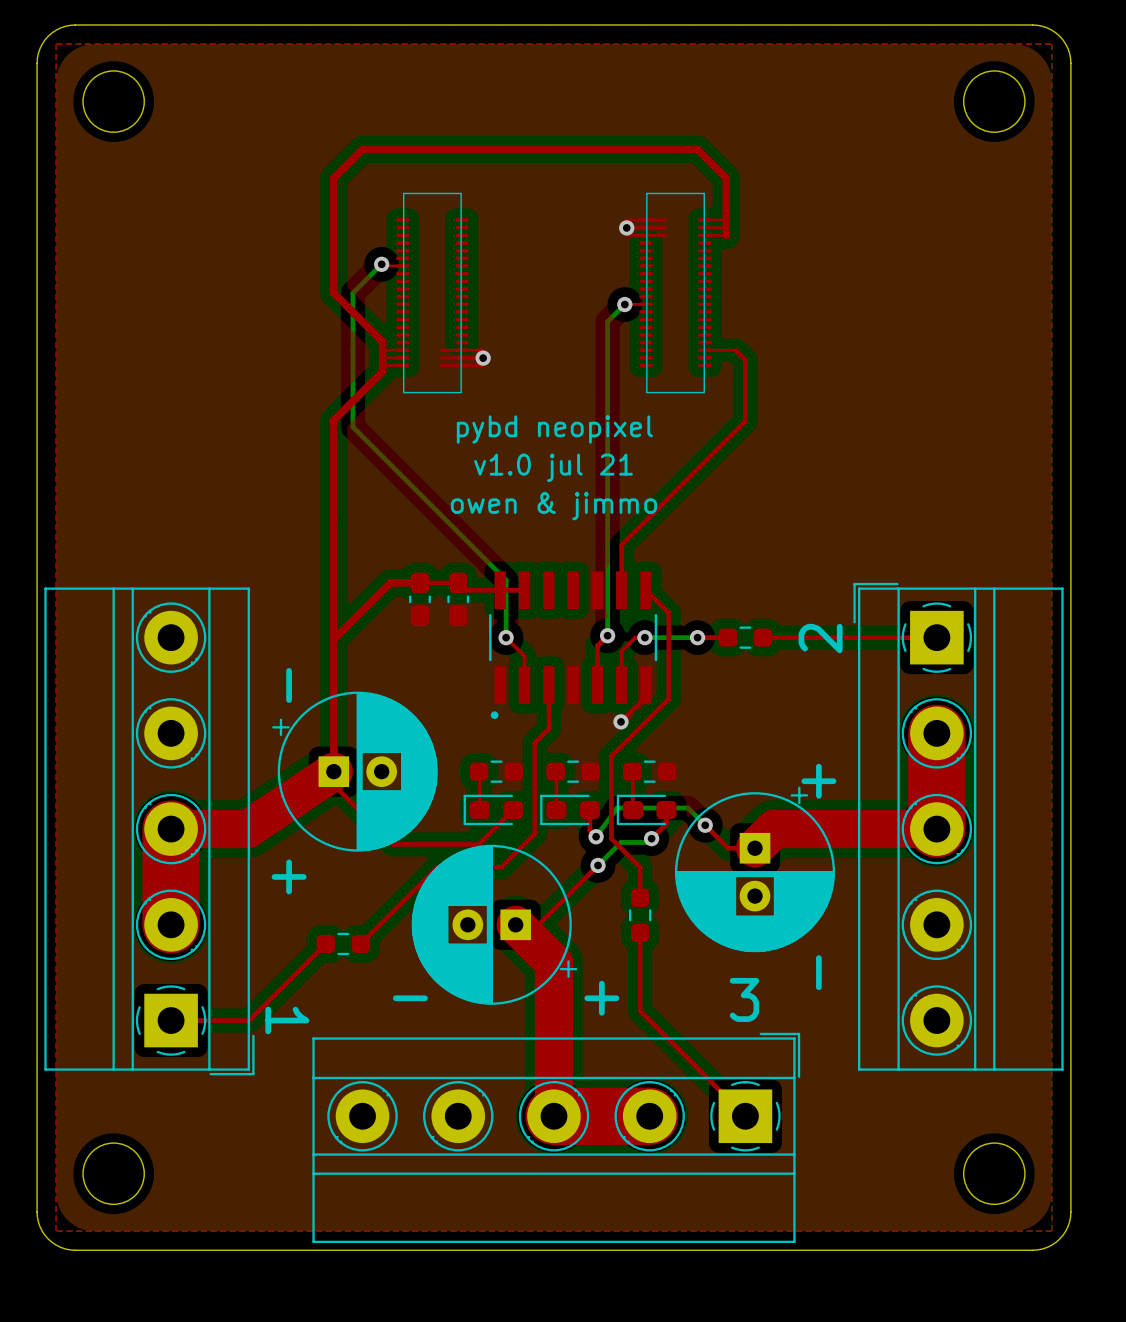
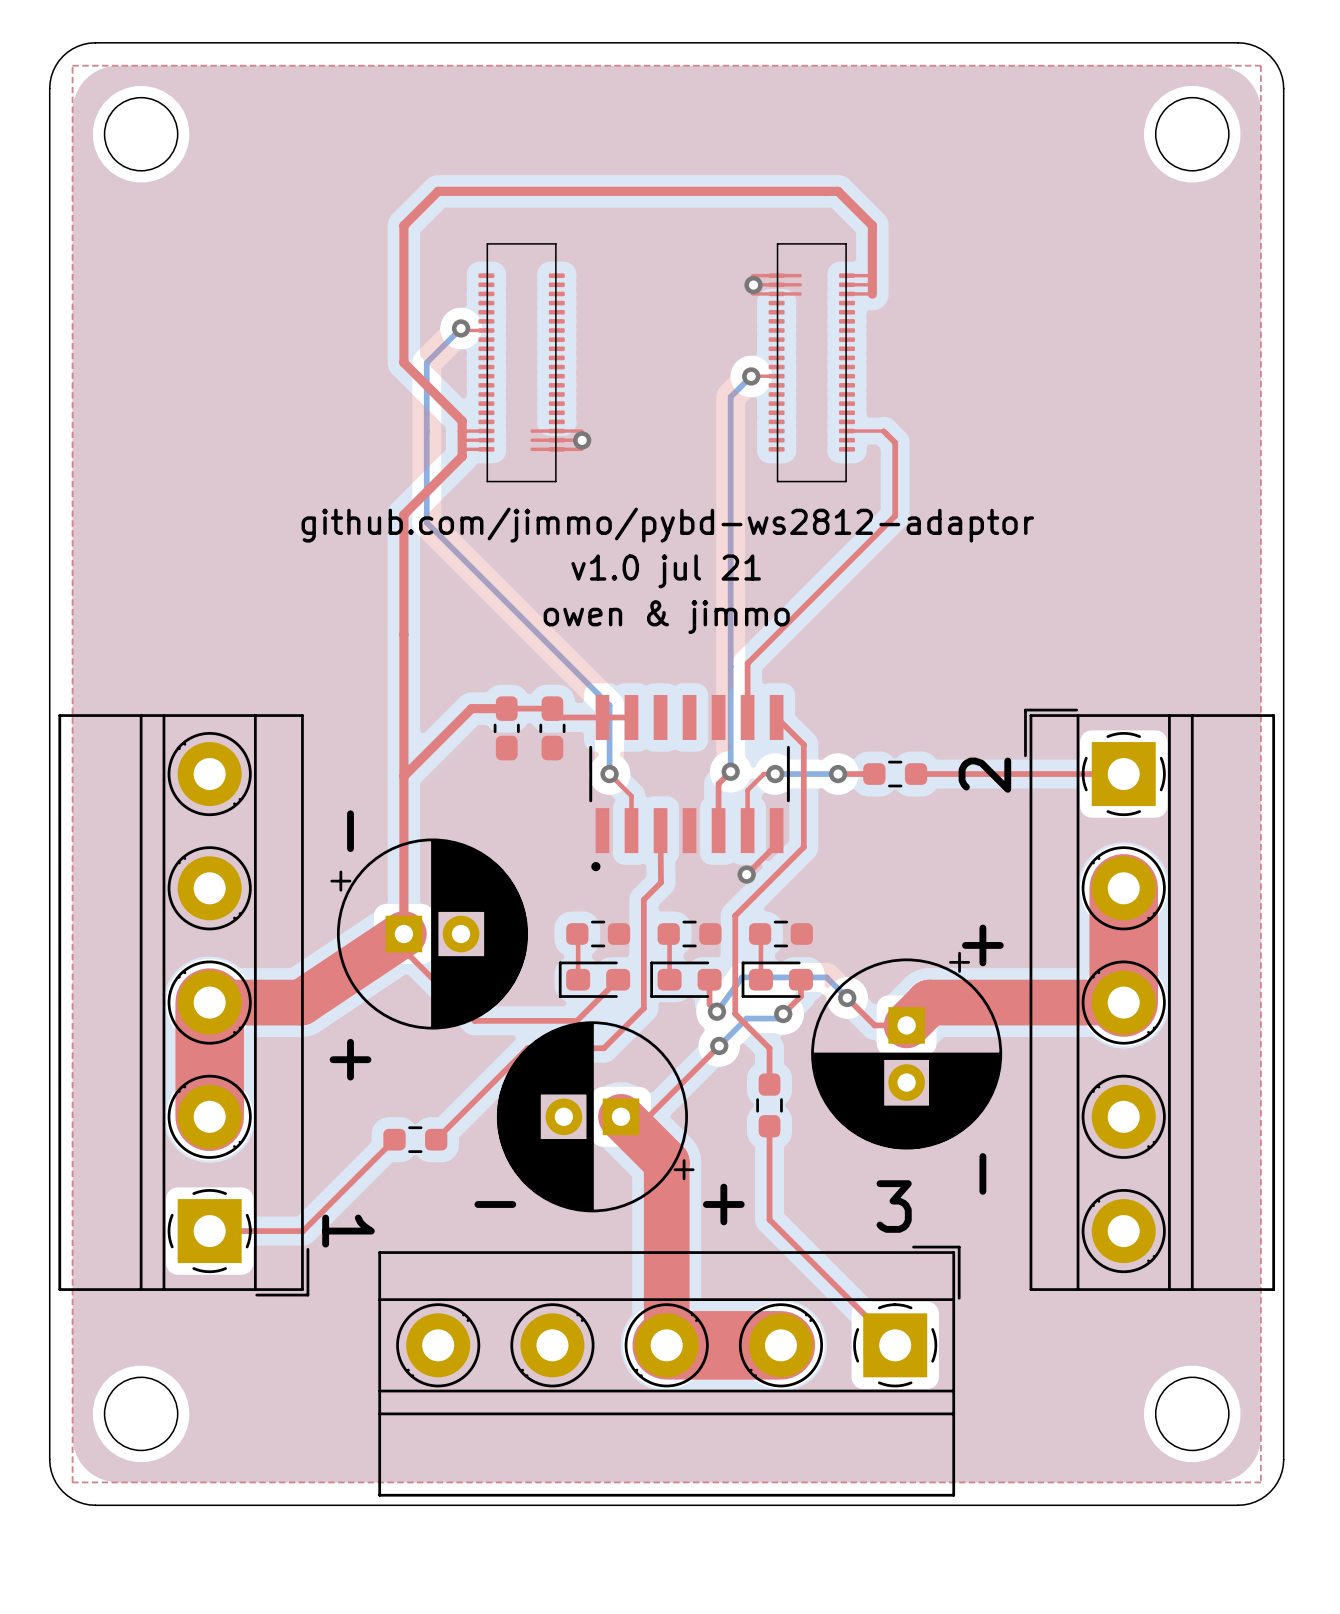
text: pybd neopixel (554, 429) -> github.com/jimmo/pybd-ws2812-adaptor (667, 525)

